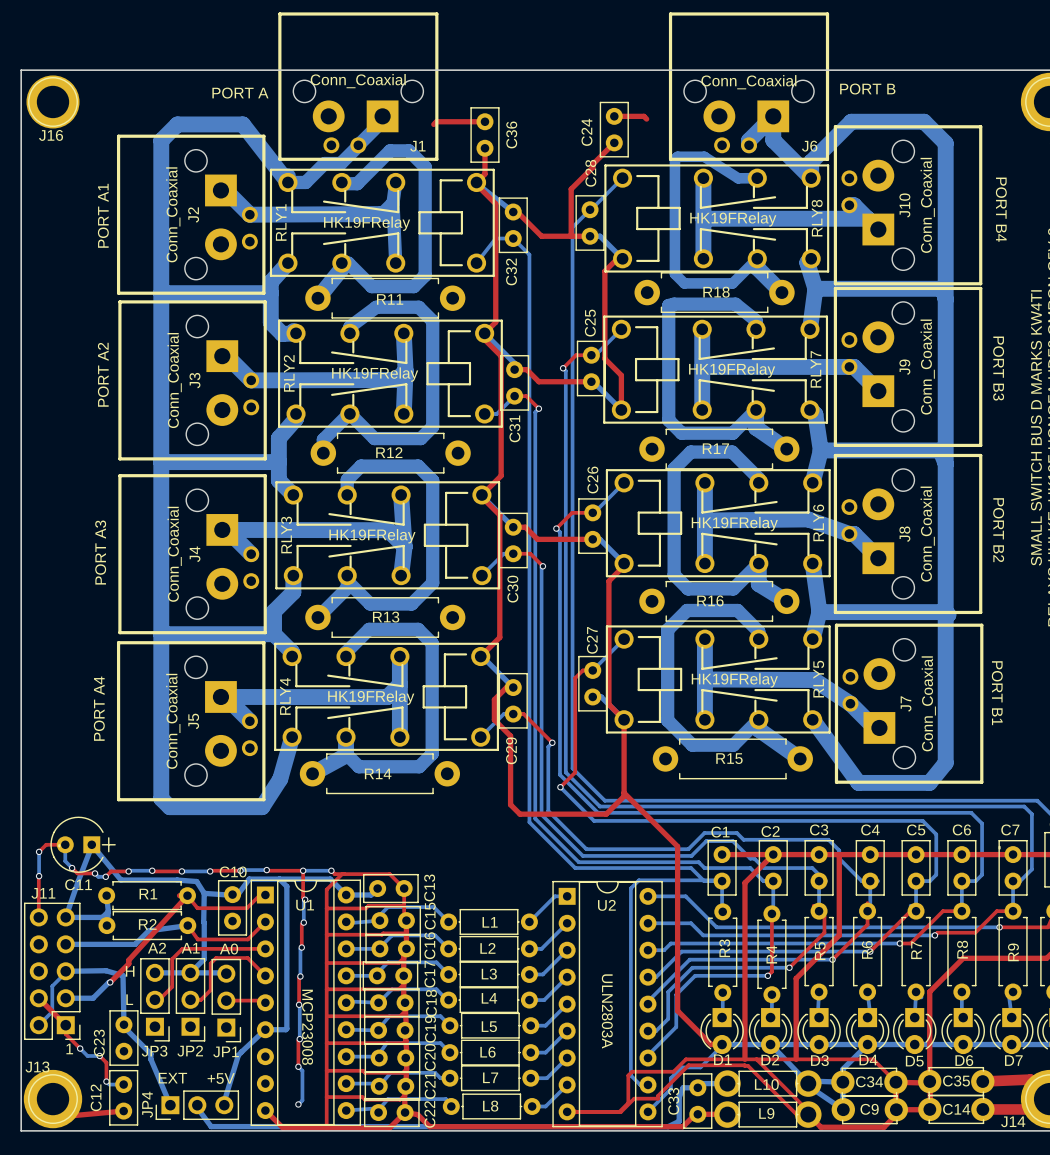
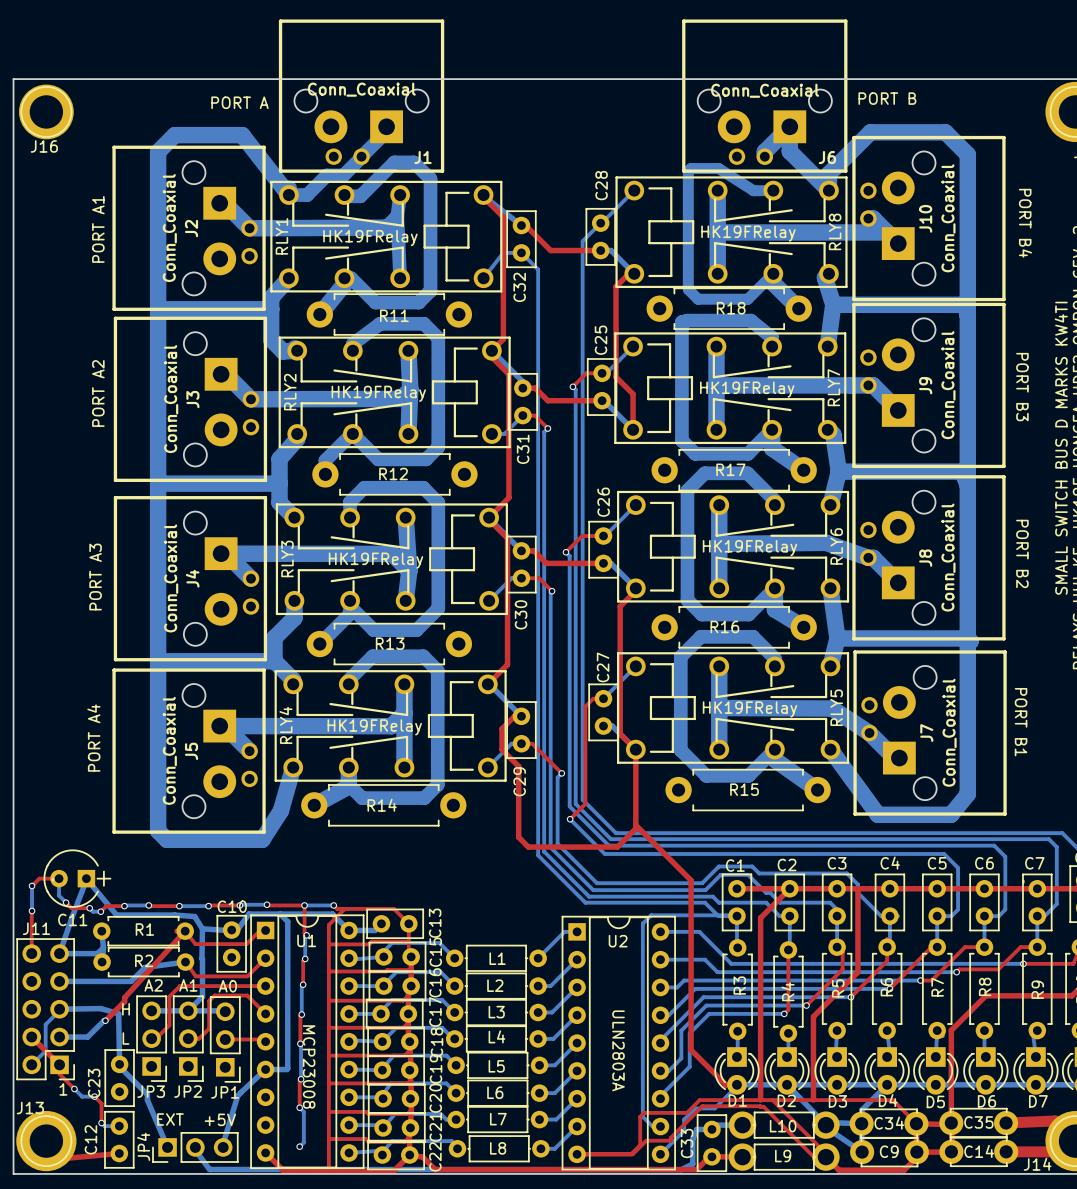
top track: (614, 116) (643, 116) (646, 119) -> none
top track: (484, 121) (436, 121) (433, 124) -> none
C24: (614, 129) -> none
C36: (484, 135) -> none
top track: (614, 142) (571, 189) (571, 236) -> none
top track: (484, 148) (484, 174) (476, 182) -> none

